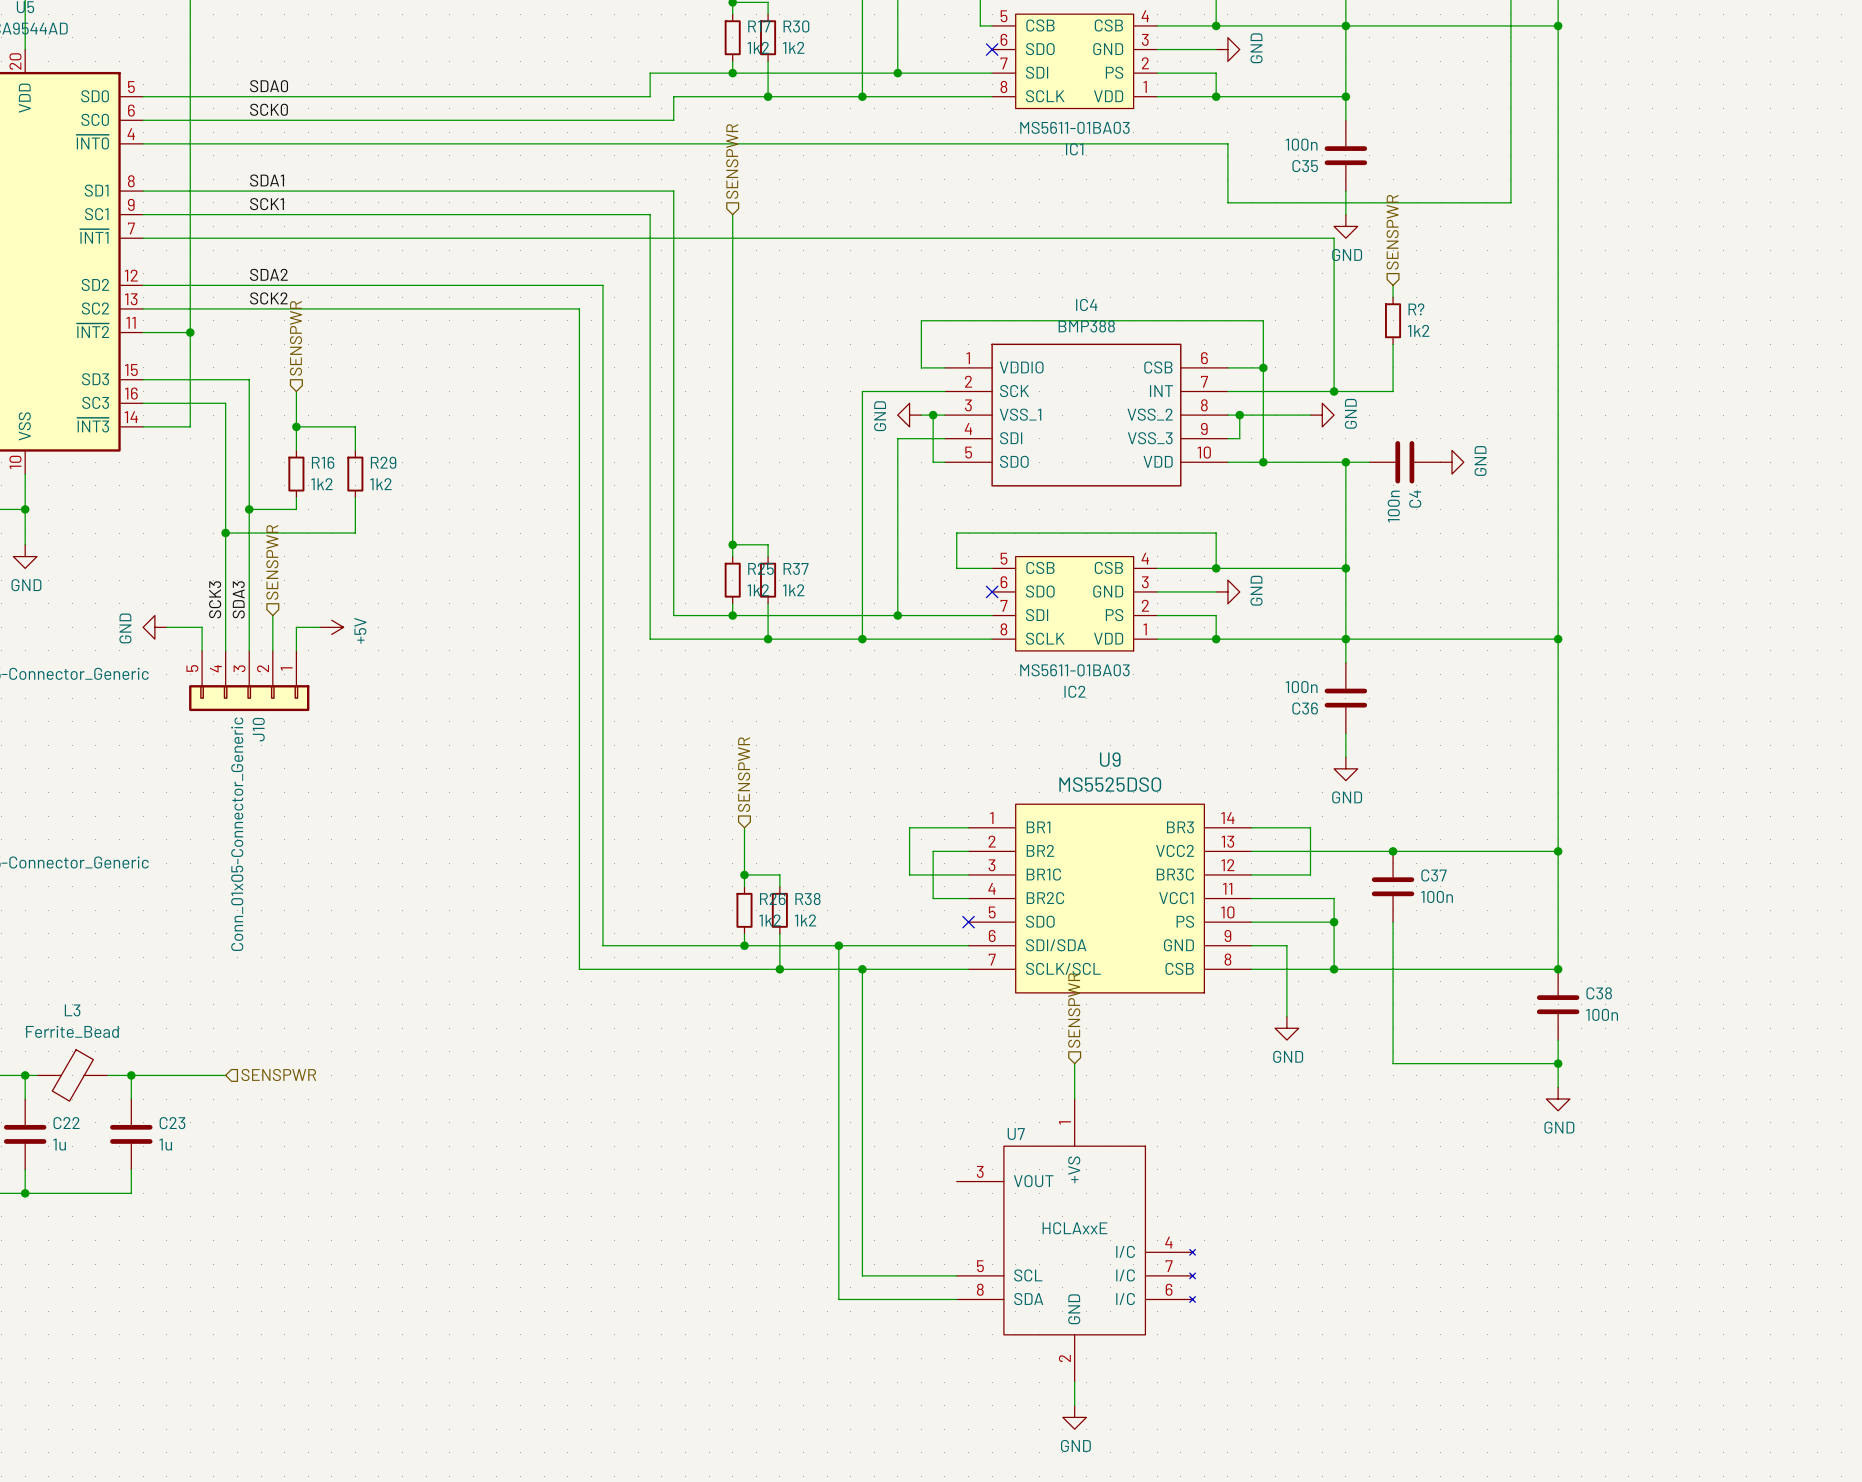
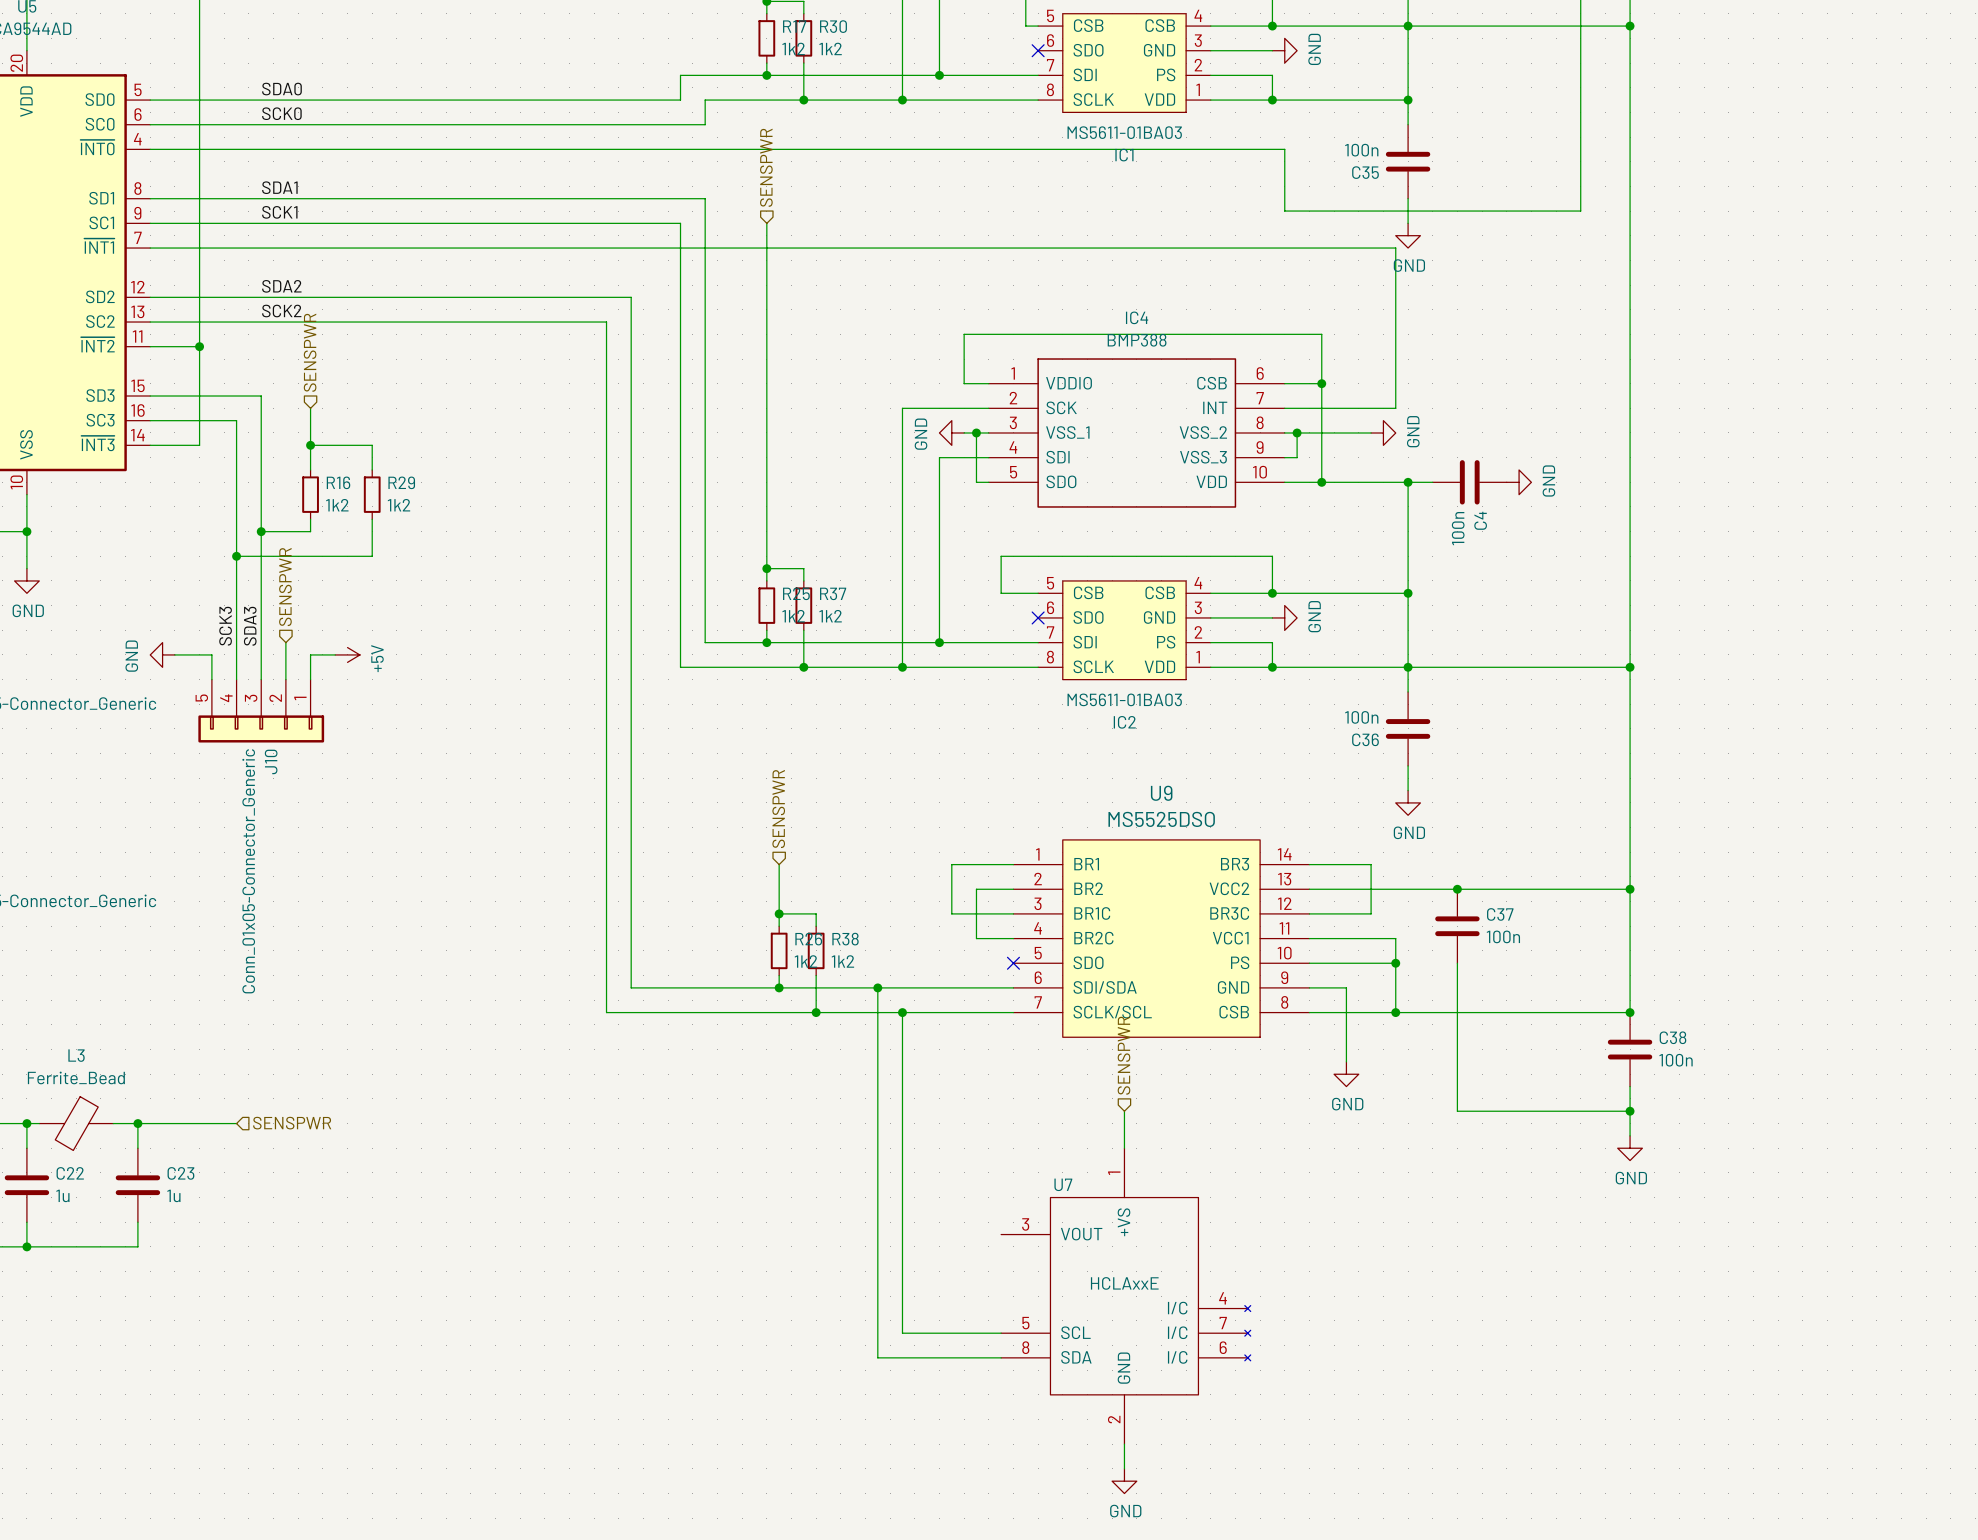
hierarchical label: SENSPWR (1392, 232) -> none
wire: (1393, 285) (1393, 297) -> none
R?: 1k2 (1393, 320) -> none
wire: (1393, 344) (1393, 391) (1334, 391) -> none
junction: (1334, 391) -> none

